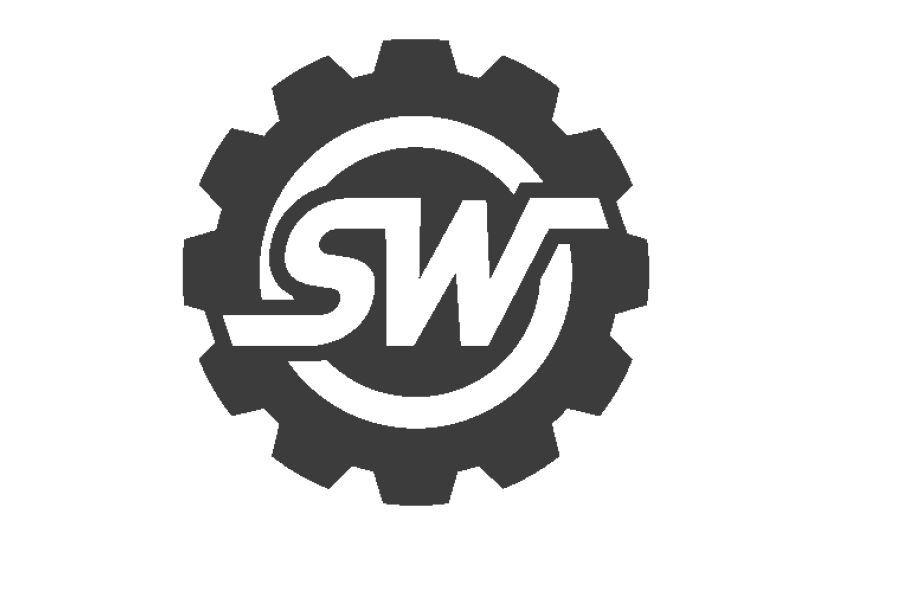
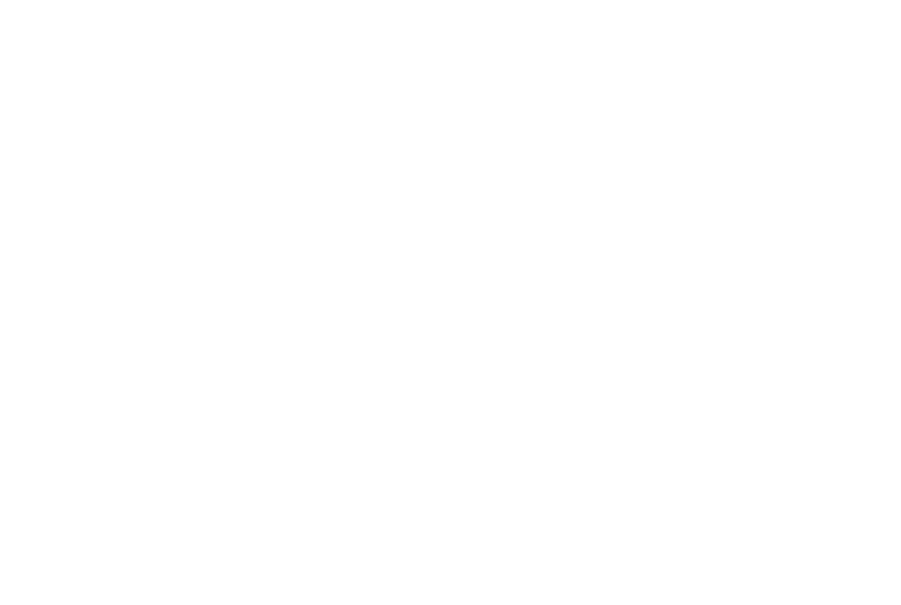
drawing: [182, 39, 650, 506] -> none

